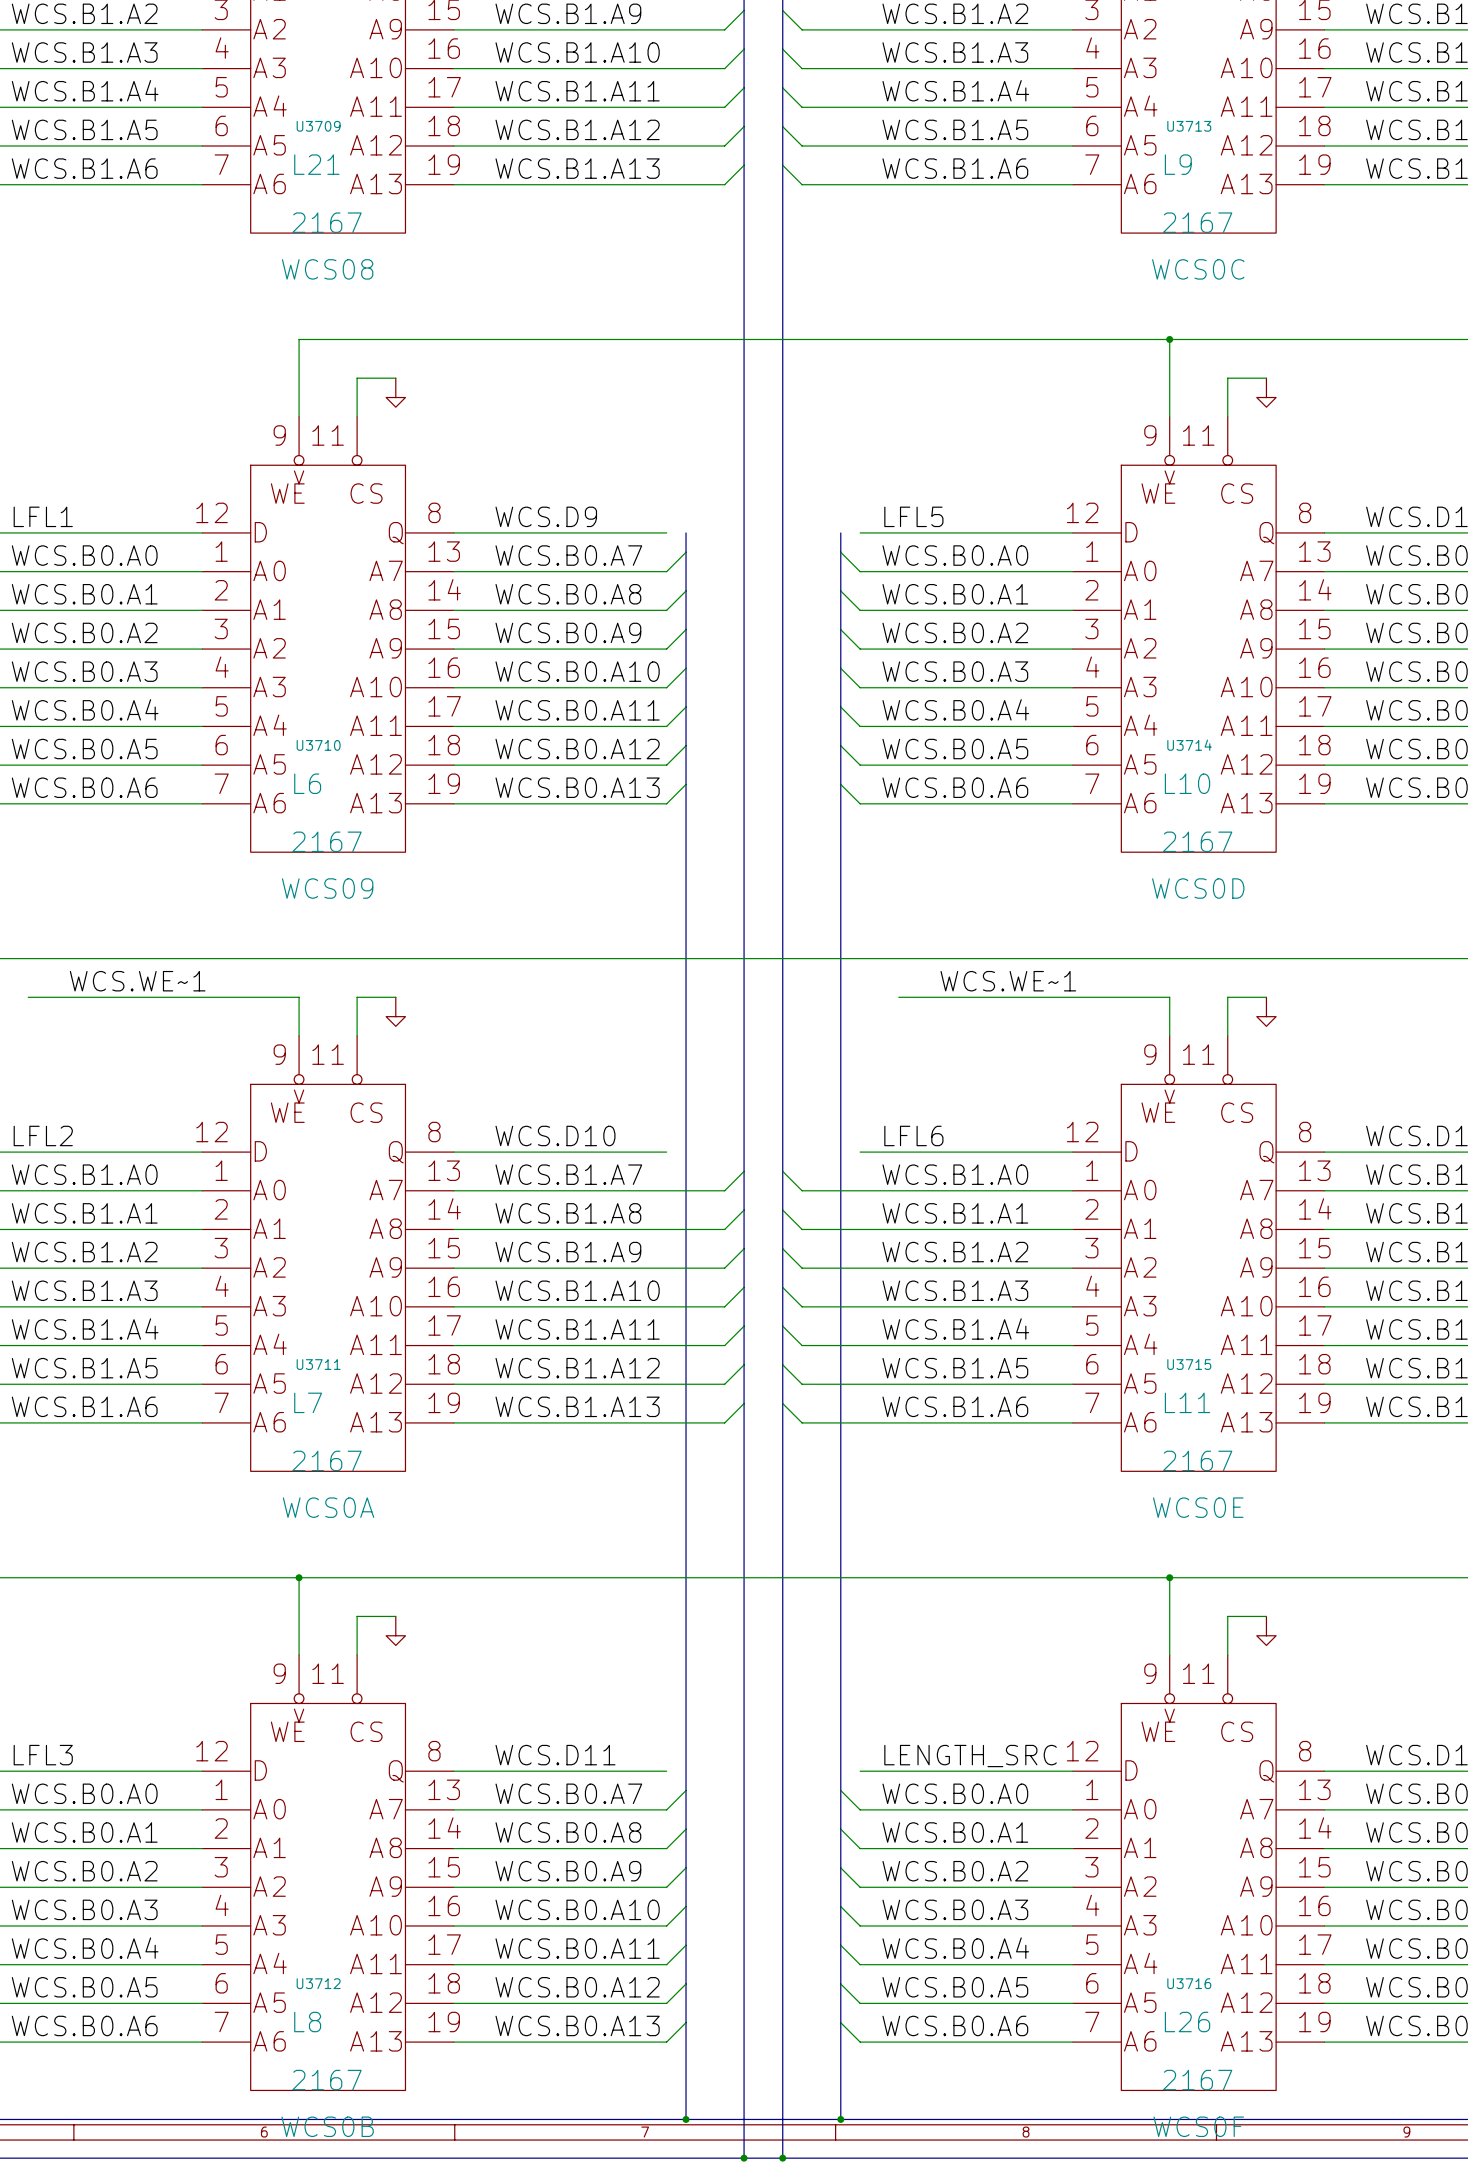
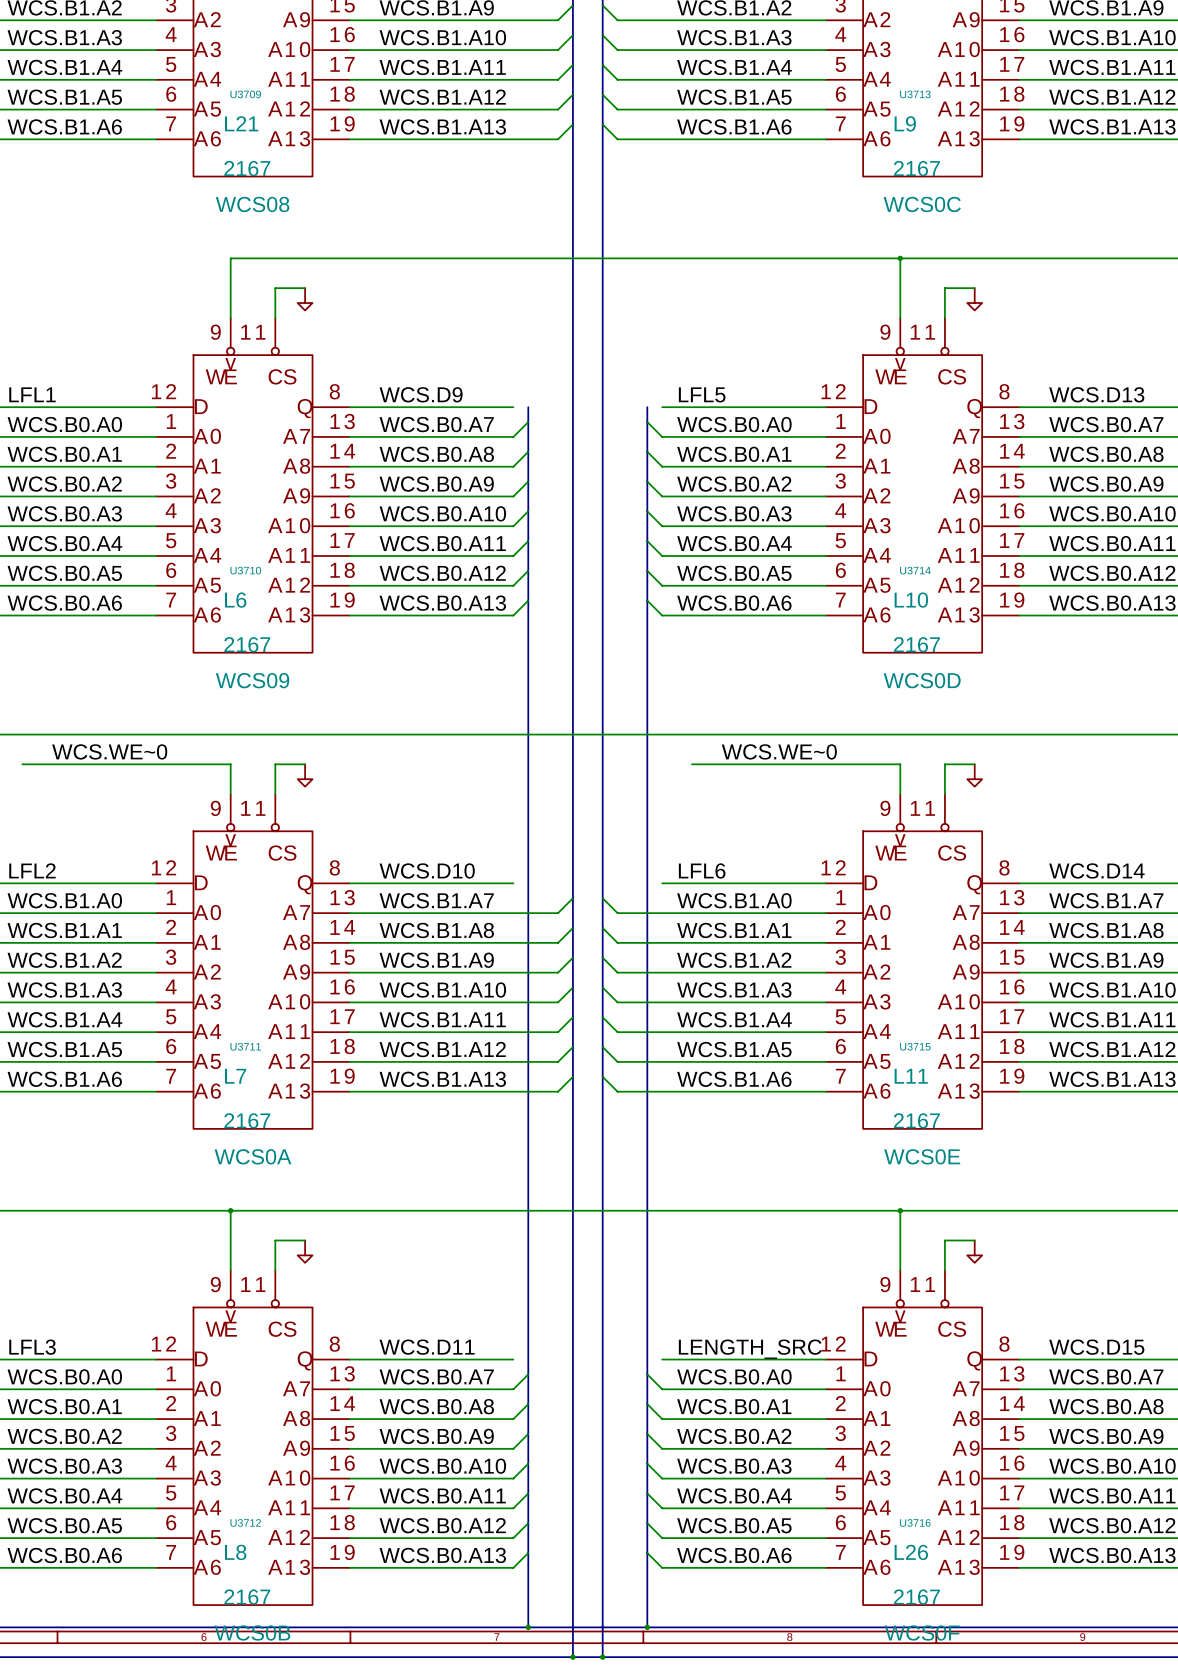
label: WCS.WE~1 (137, 981) -> WCS.WE~0 (109, 751)
label: WCS.WE~1 (1008, 981) -> WCS.WE~0 (779, 751)

